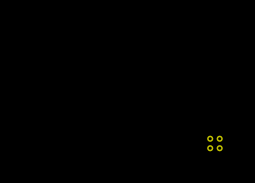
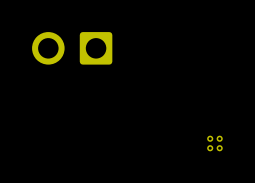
part: none -> (72, 48)

